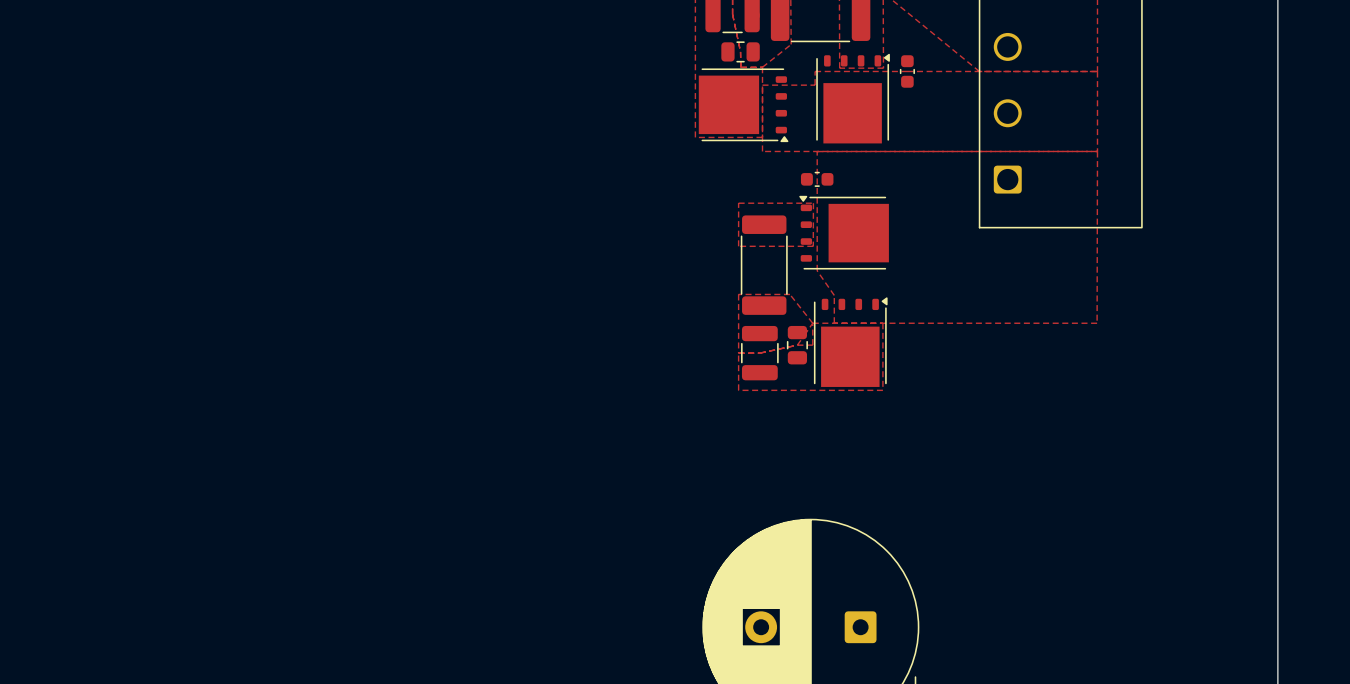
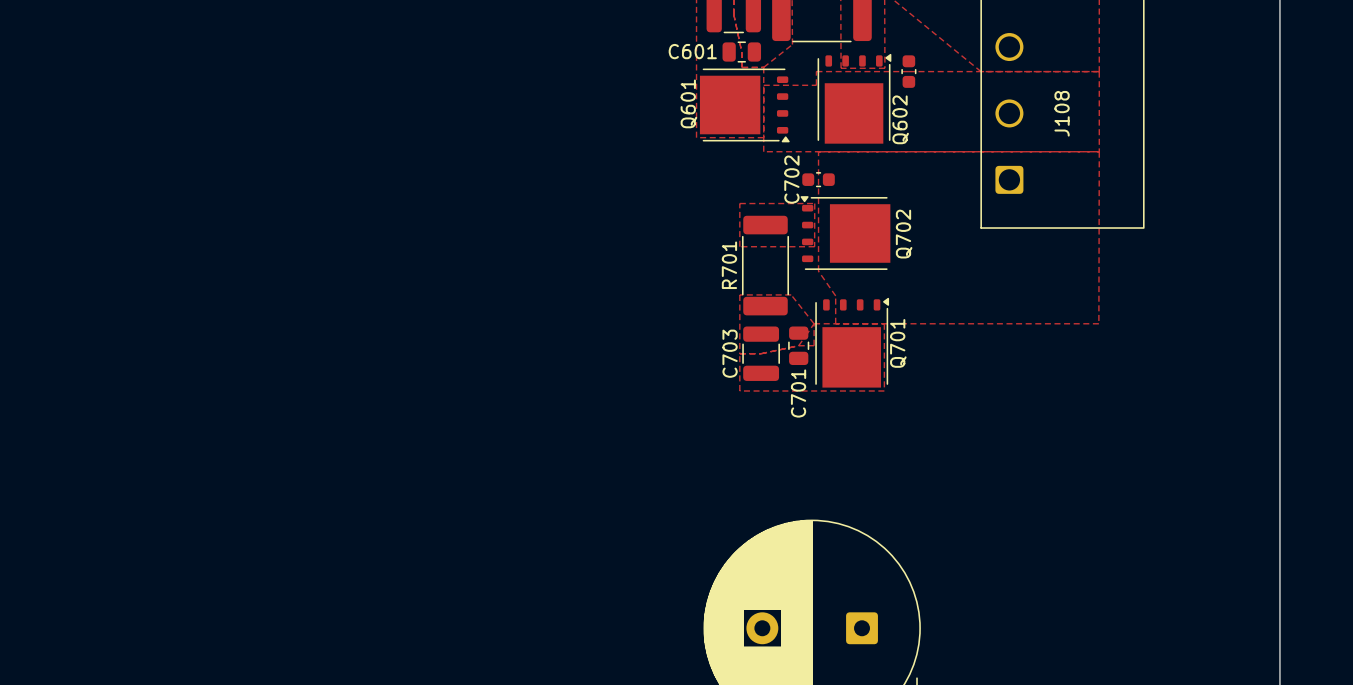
C601 name: none -> C601 (692, 51)
Q601 name: none -> Q601 (688, 103)
J108 name: none -> J108 (1062, 113)
Q602 name: none -> Q602 (900, 119)
C702 name: none -> C702 (791, 179)
Q702 name: none -> Q702 (904, 234)
R701 name: none -> R701 (729, 265)
Q701 name: none -> Q701 (898, 343)
C703 name: none -> C703 (730, 353)
C701 name: none -> C701 (798, 393)

